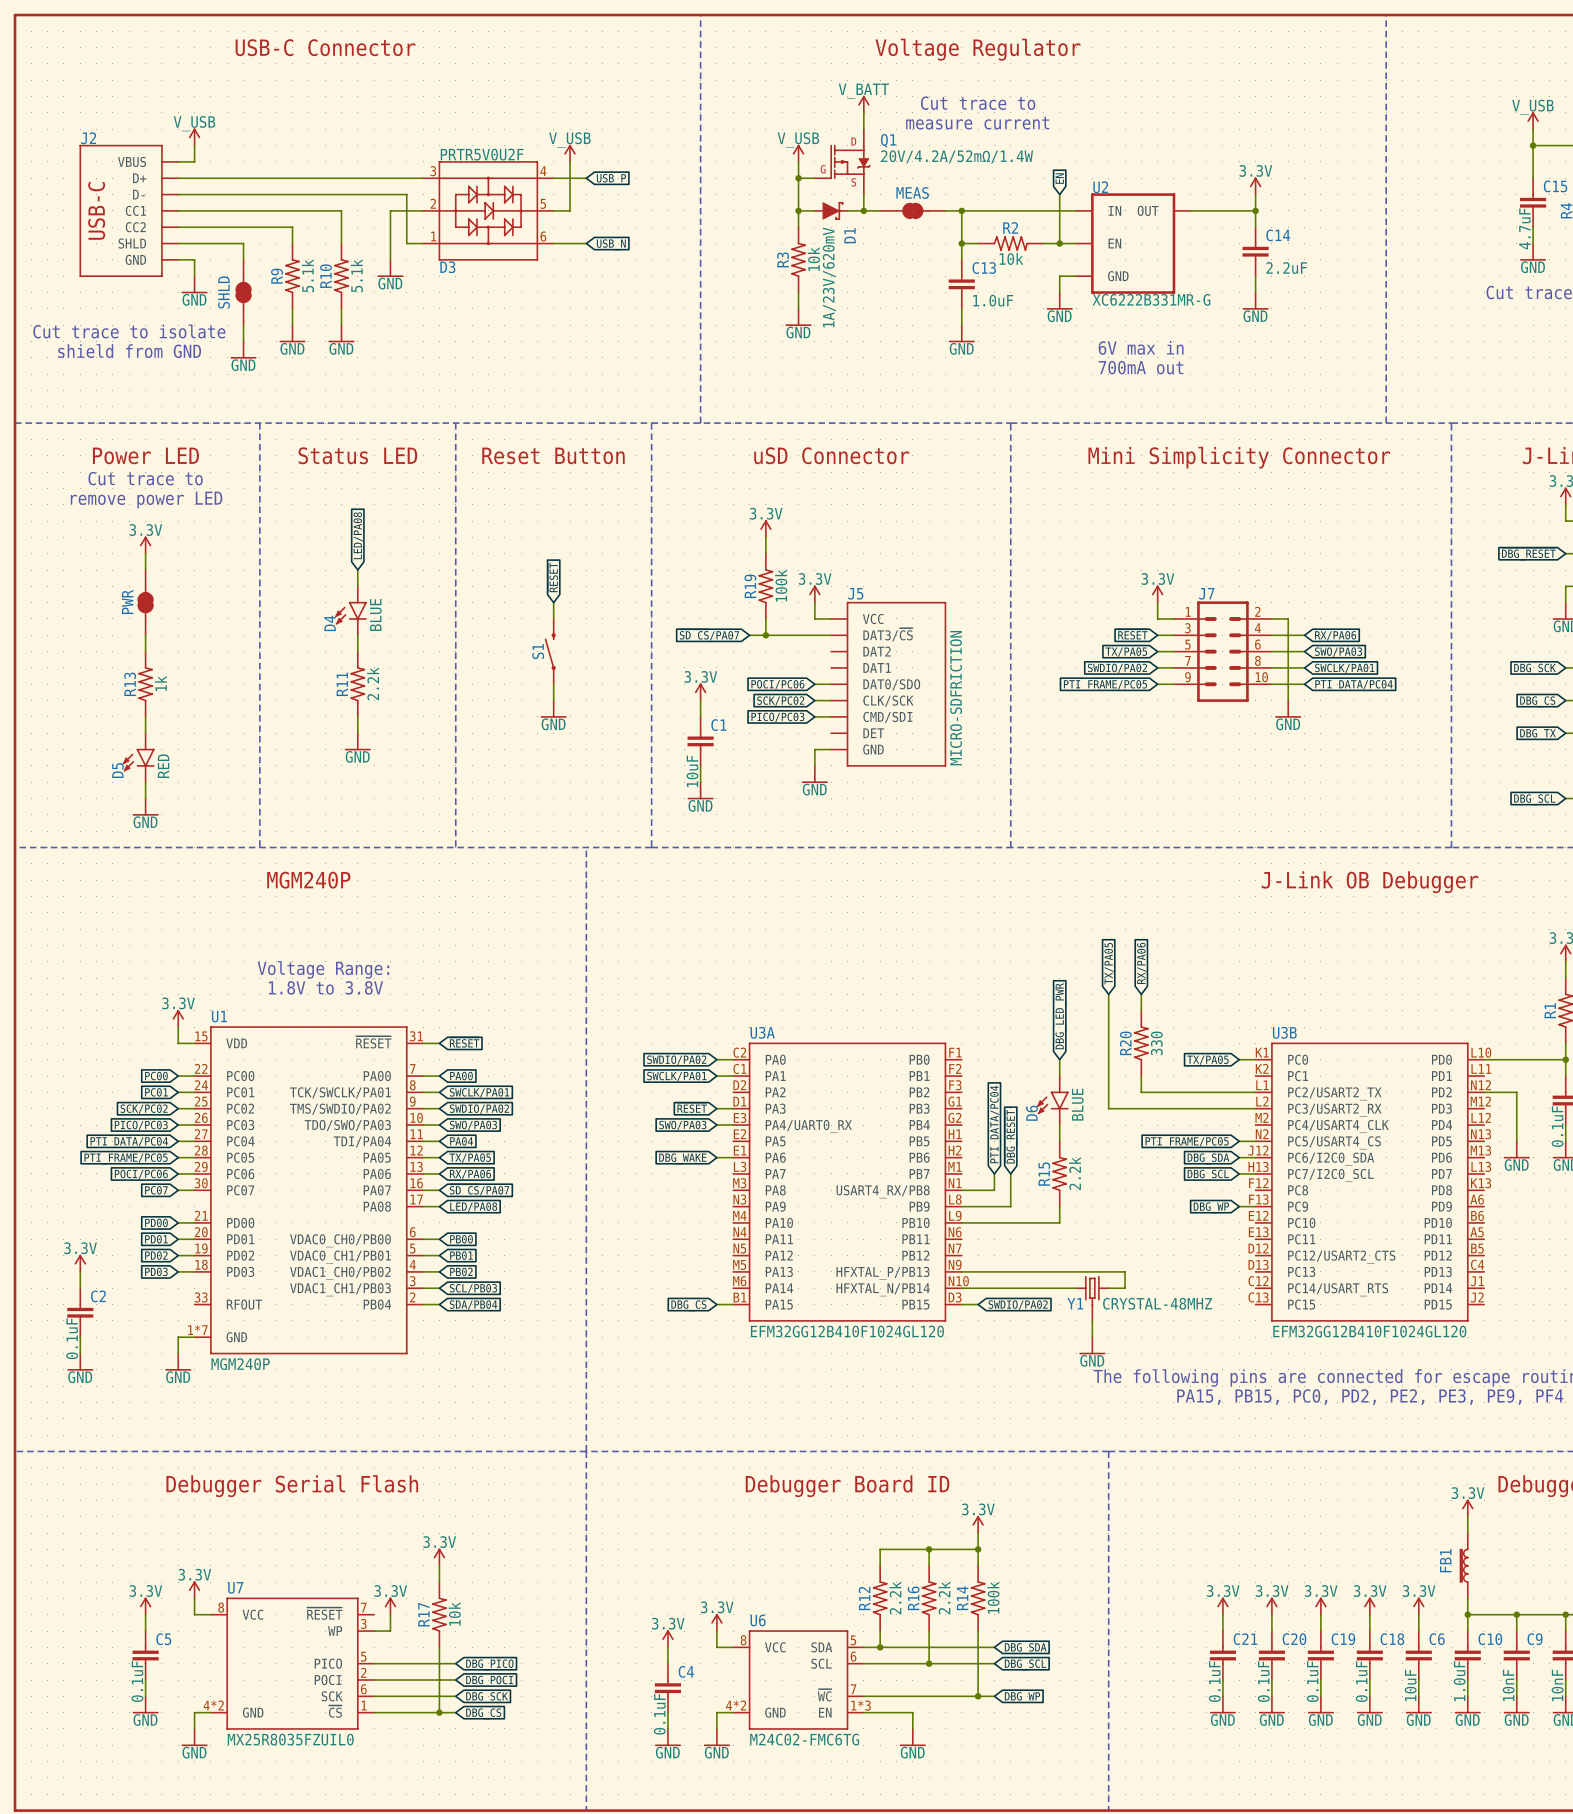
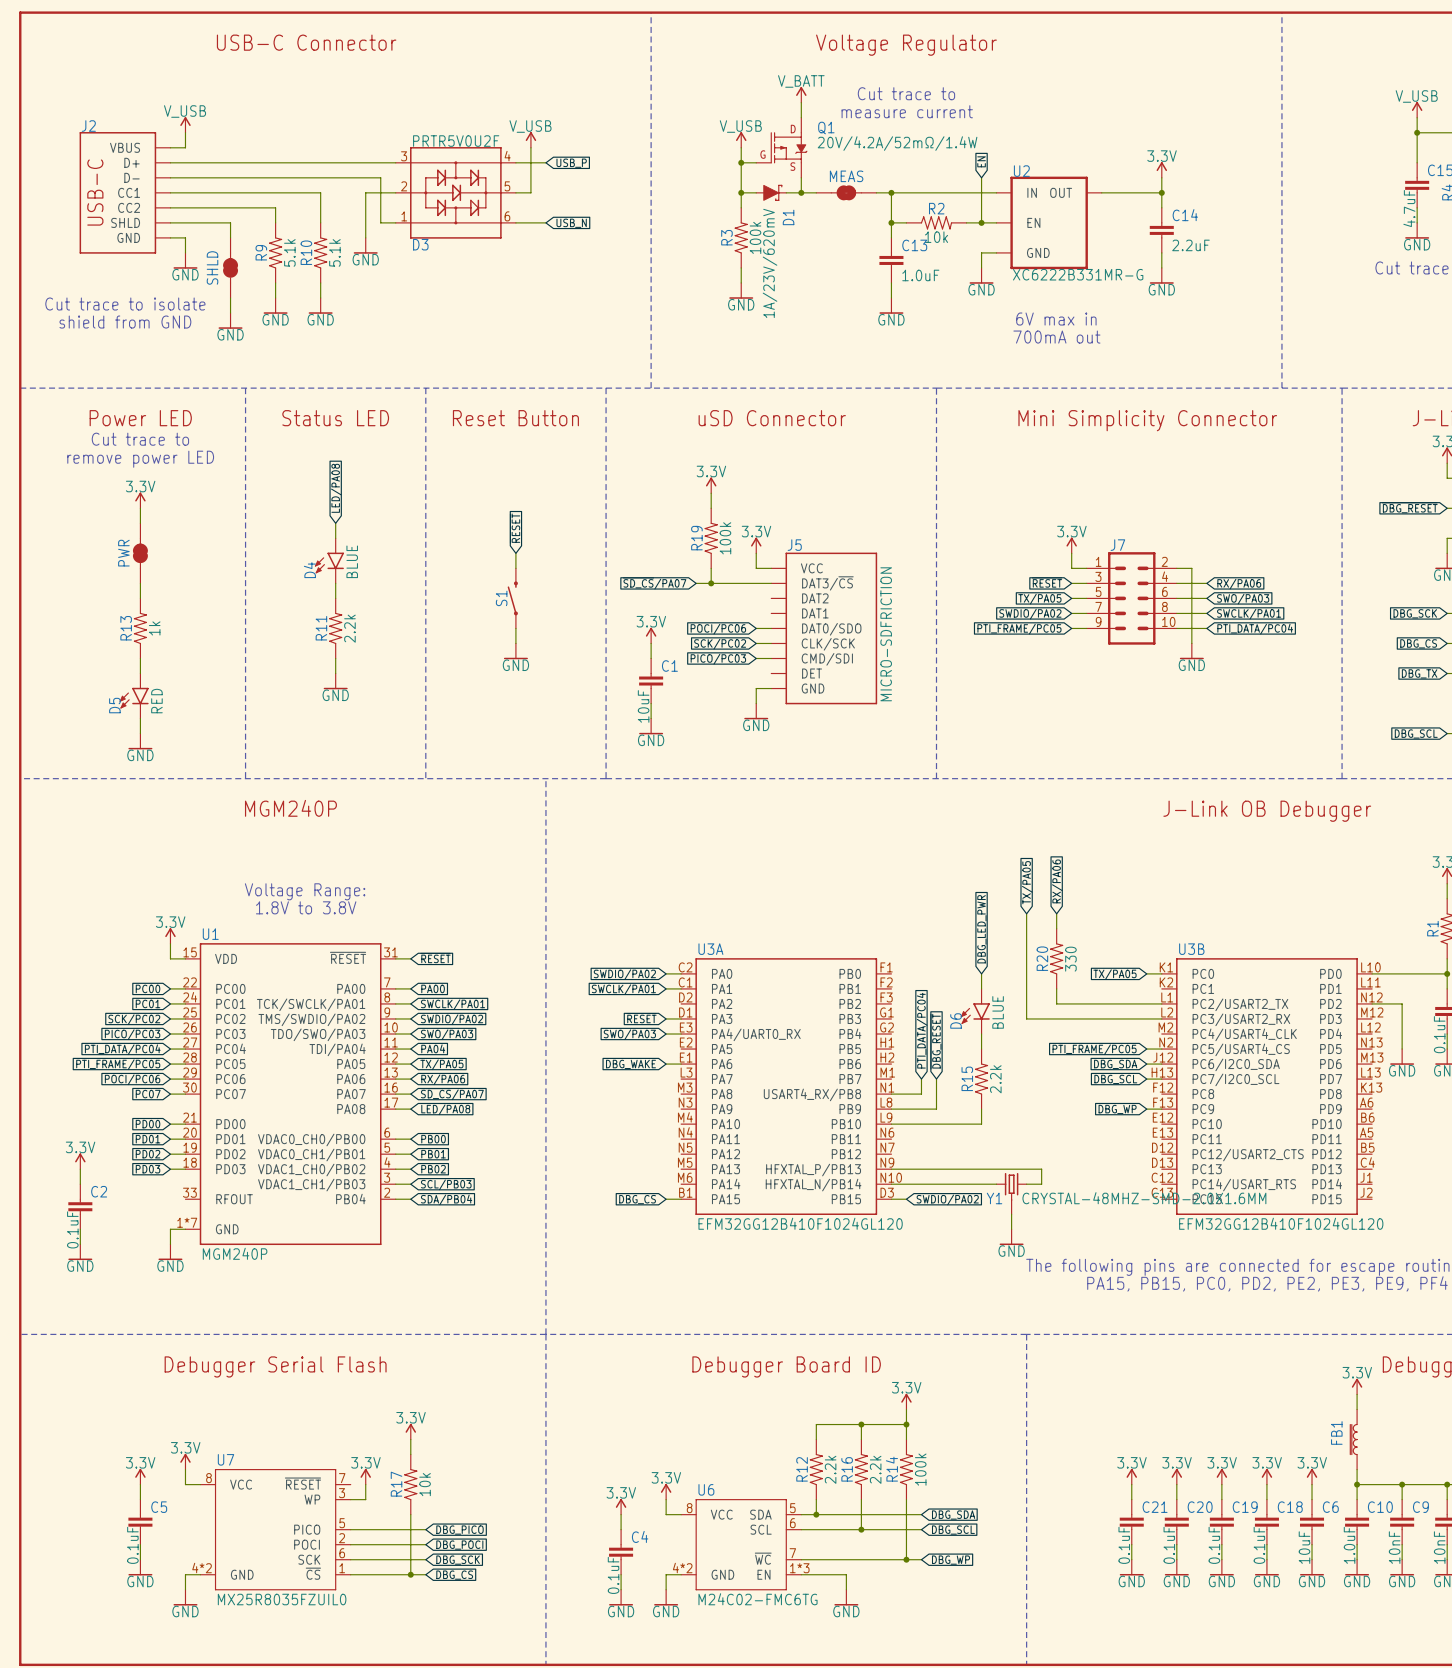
R3 value: 10k (813, 259) -> 100k (755, 237)
Y1 value: CRYSTAL-48MHZ (1157, 1303) -> CRYSTAL-48MHZ-SMD-2.0X1.6MM (1144, 1198)

